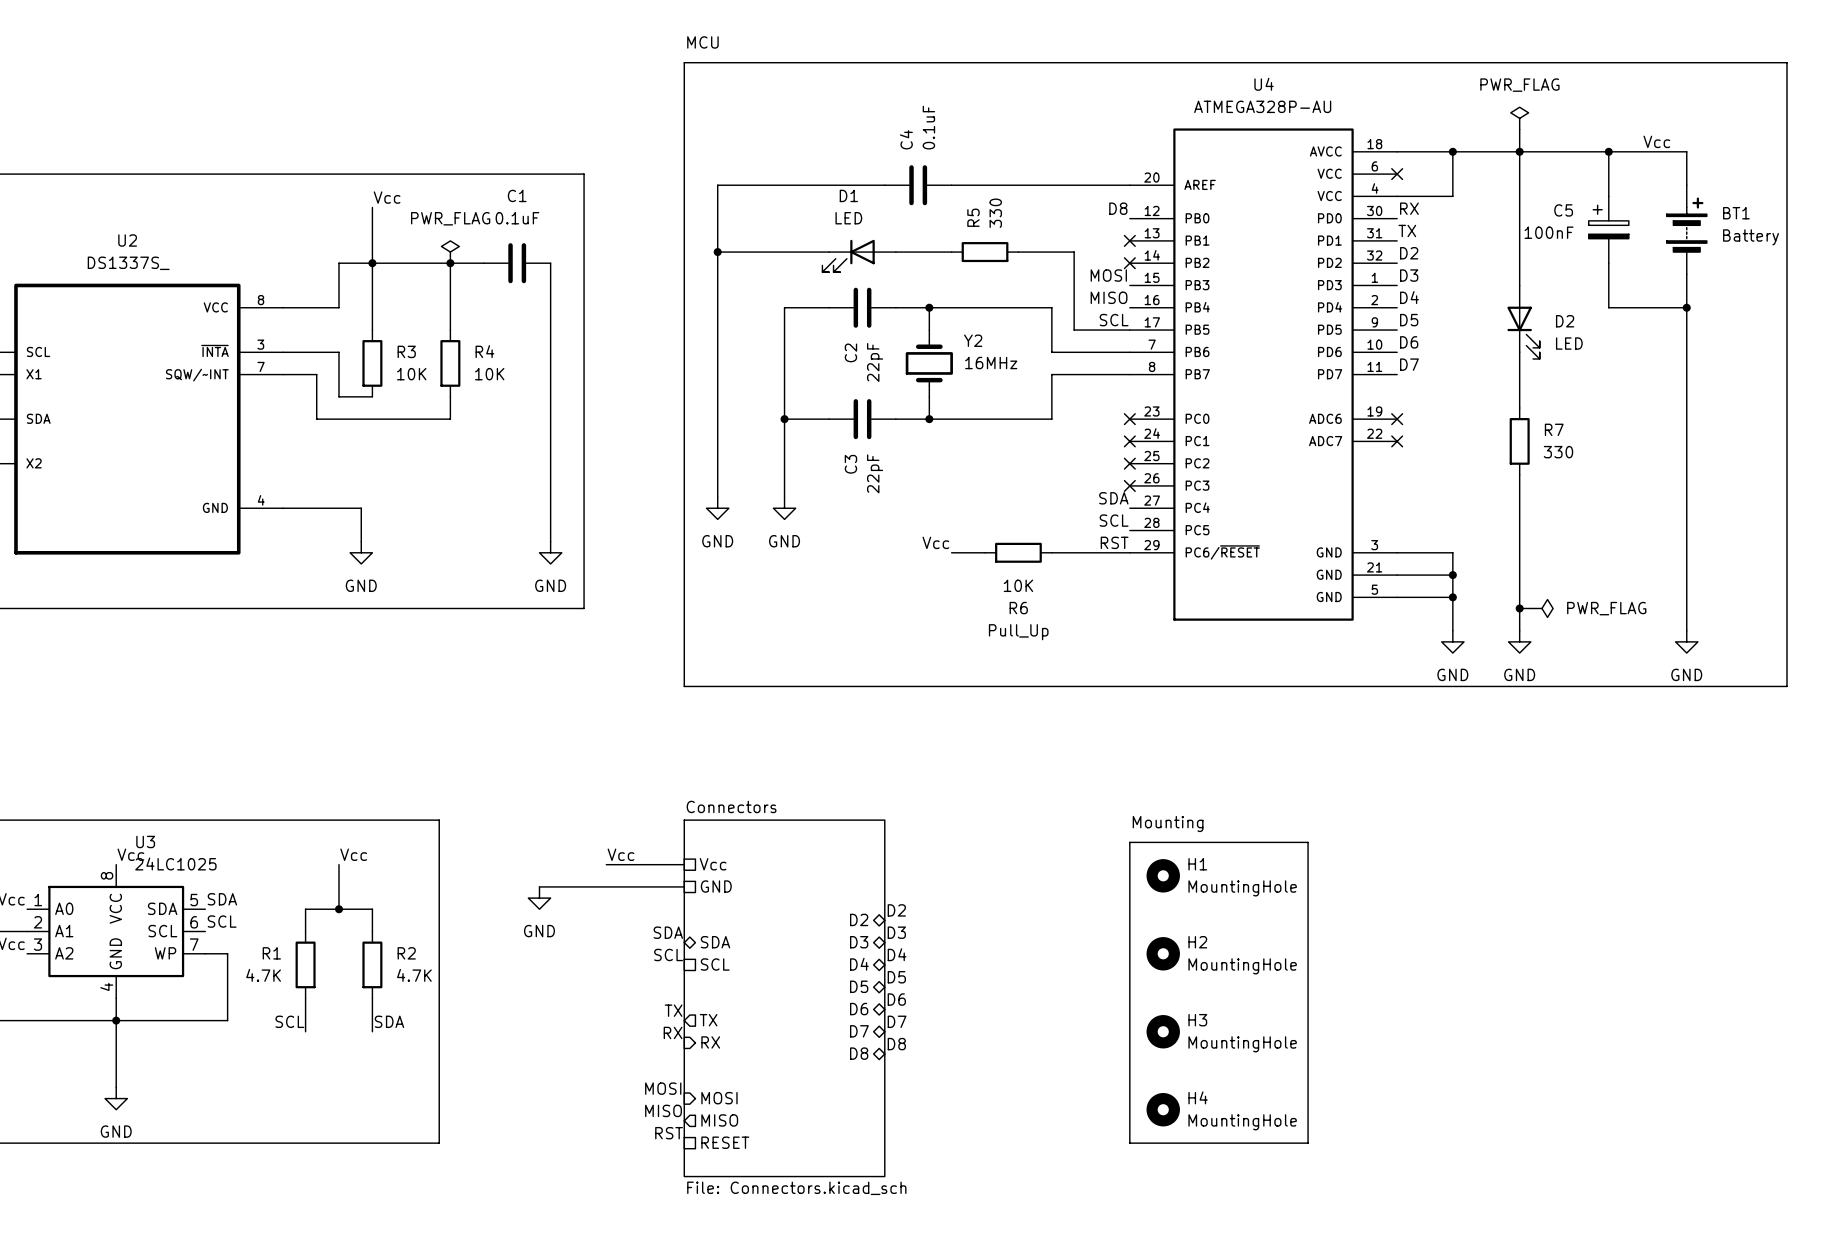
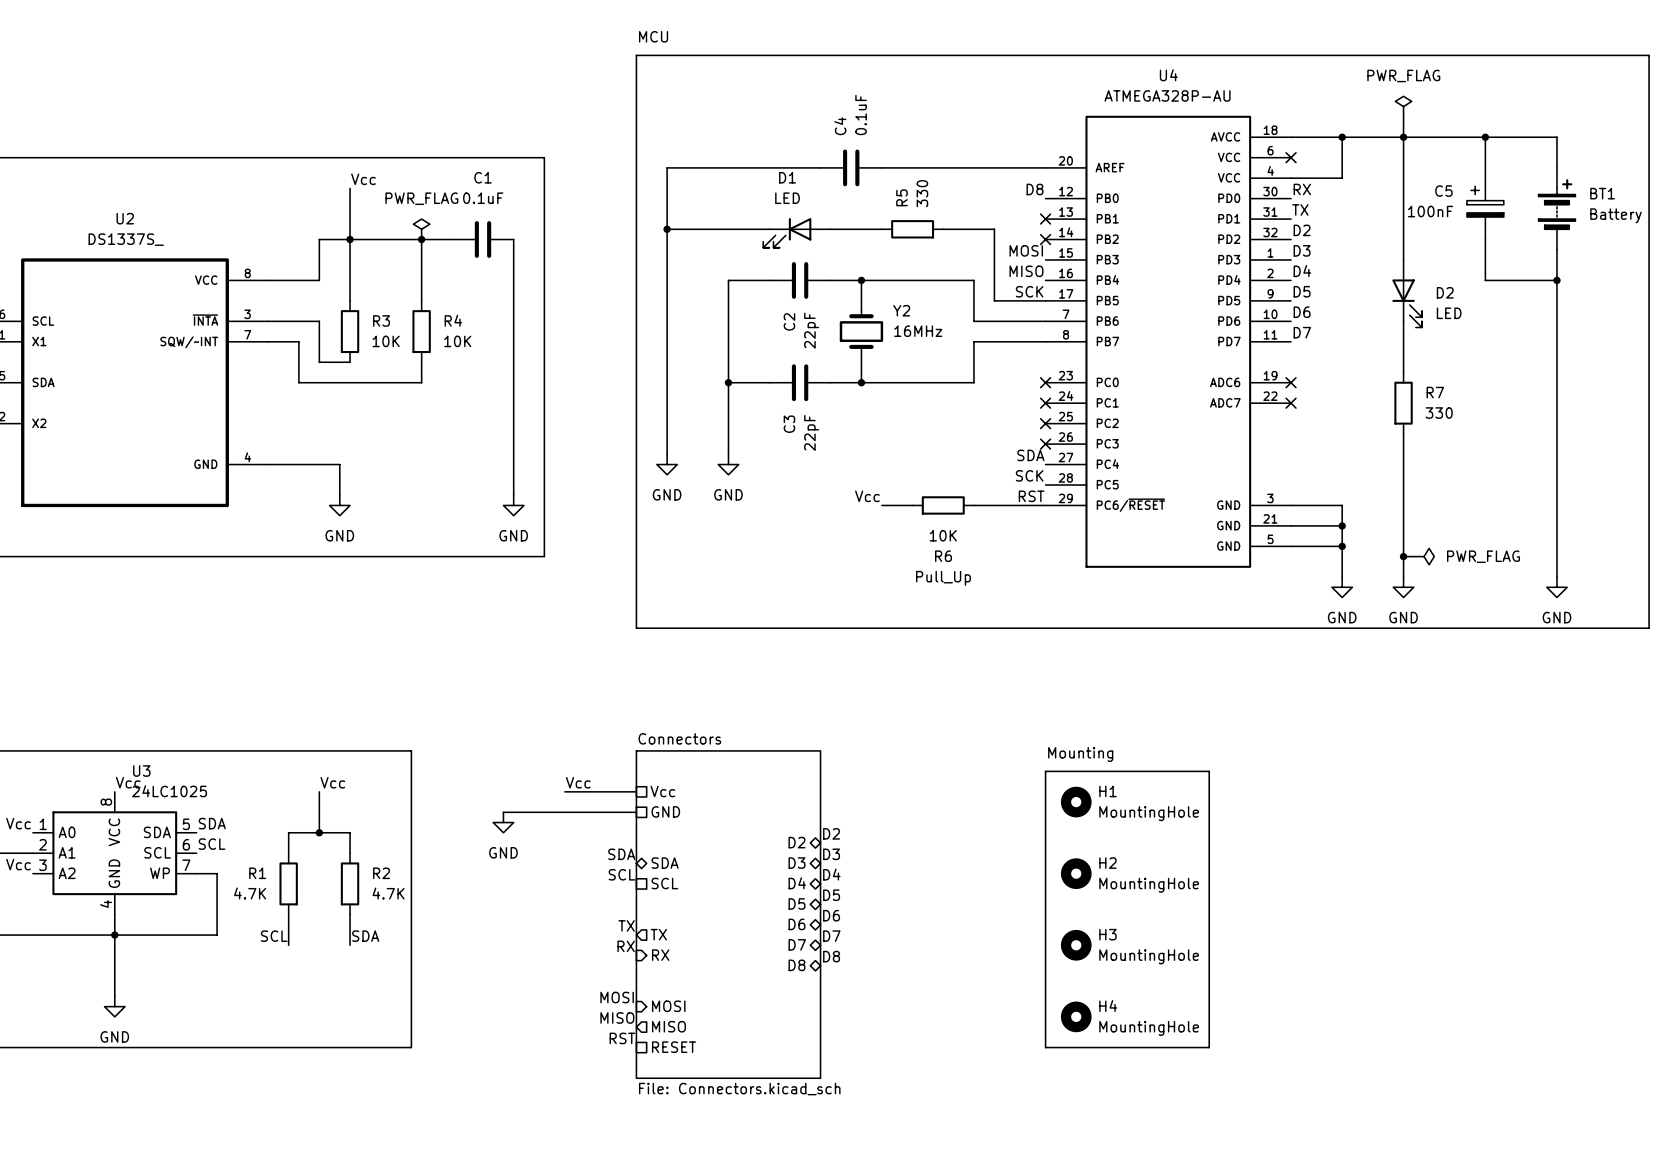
label: Vcc (1656, 141) -> none
label: SCL (1114, 320) -> SCK (1029, 291)
label: SCL (1114, 520) -> SCK (1029, 475)

